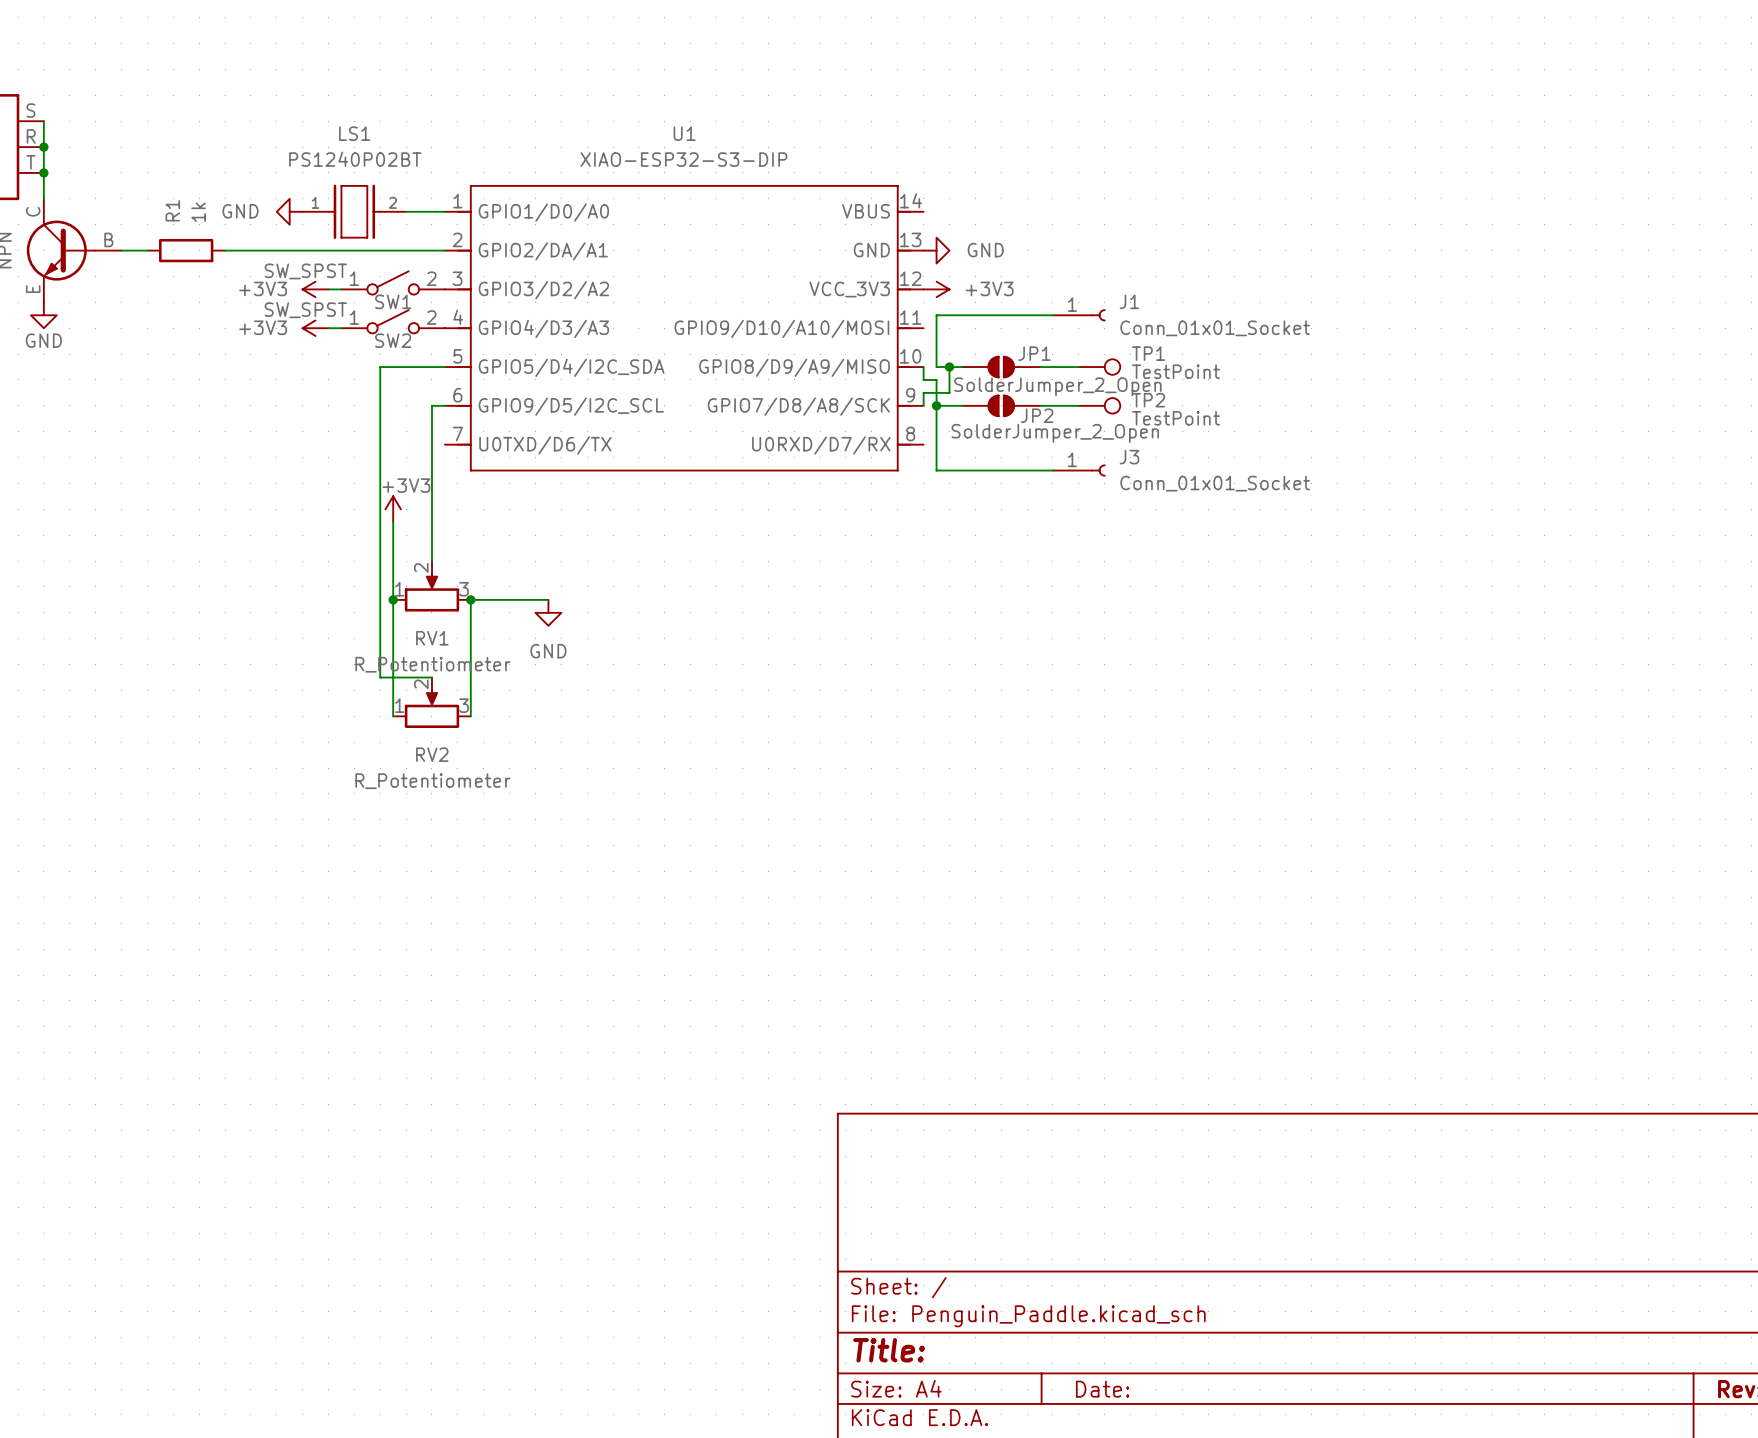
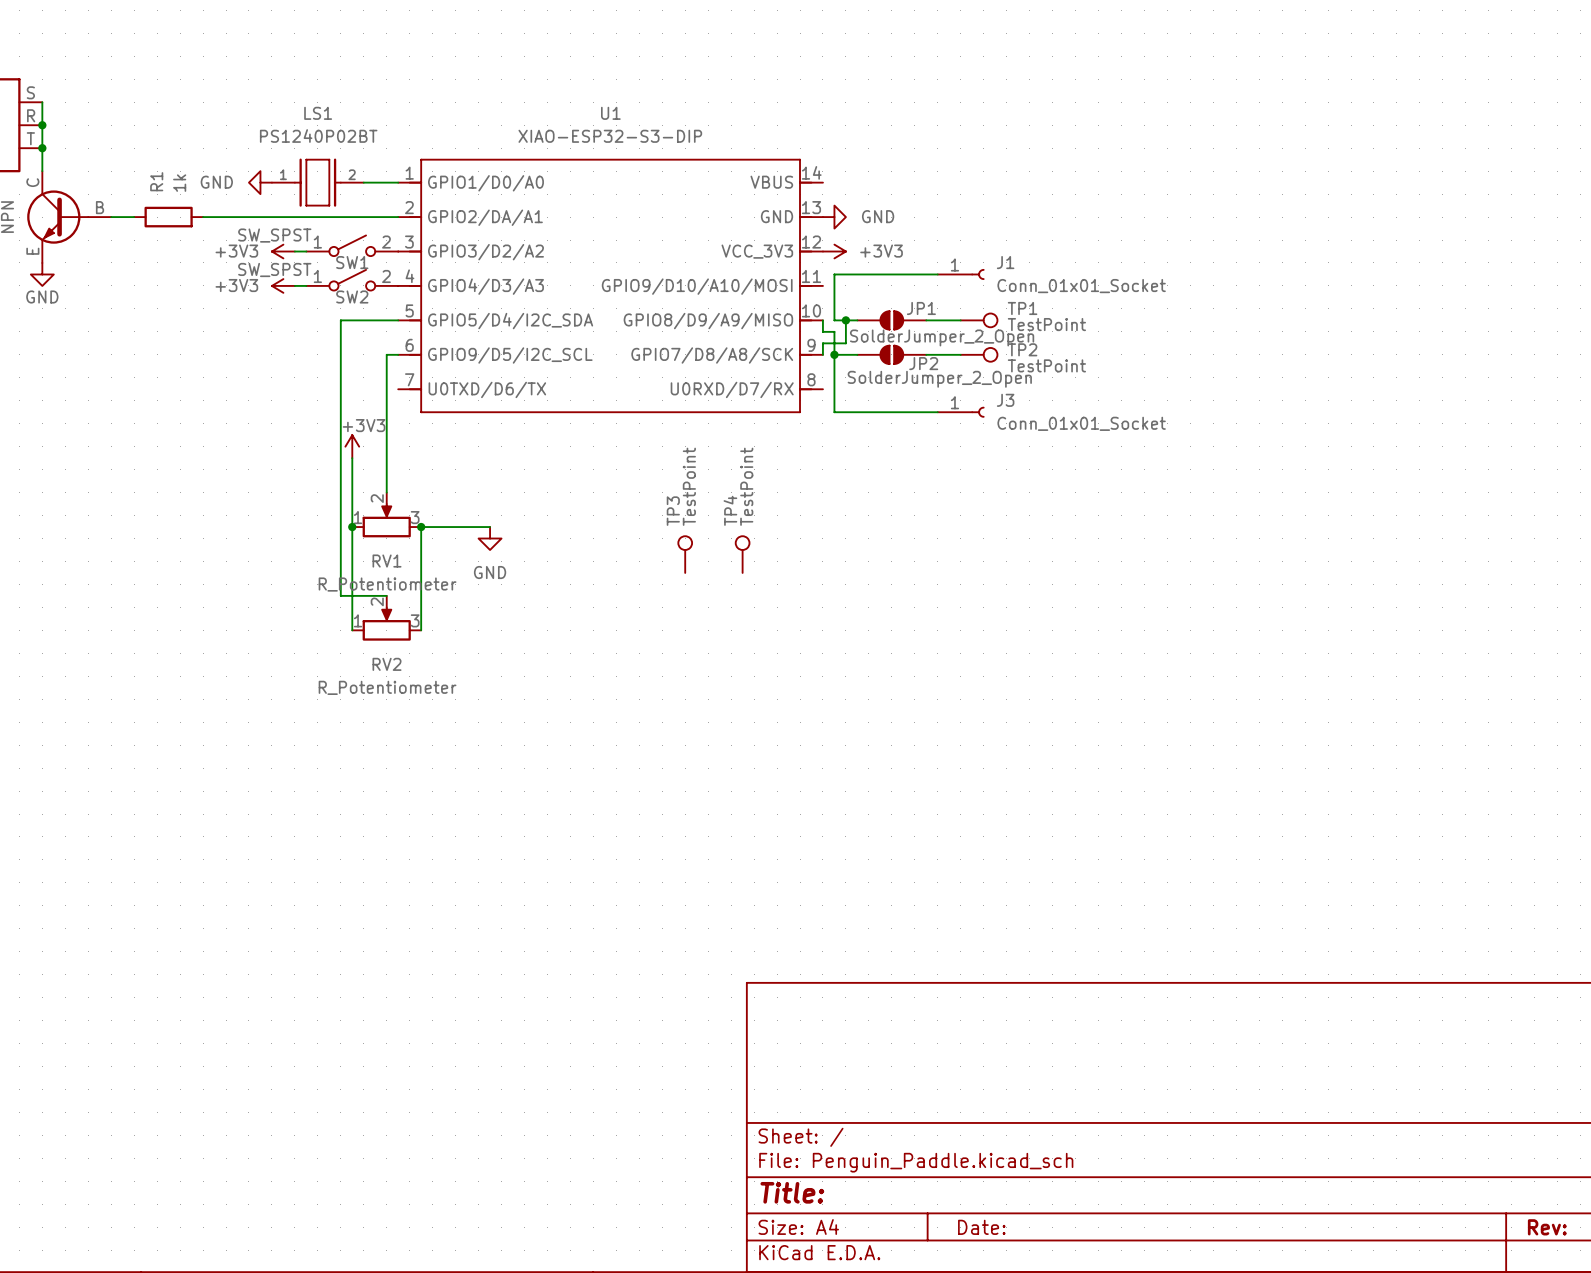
TP3: none -> TestPoint (685, 554)
TP4: none -> TestPoint (742, 554)

